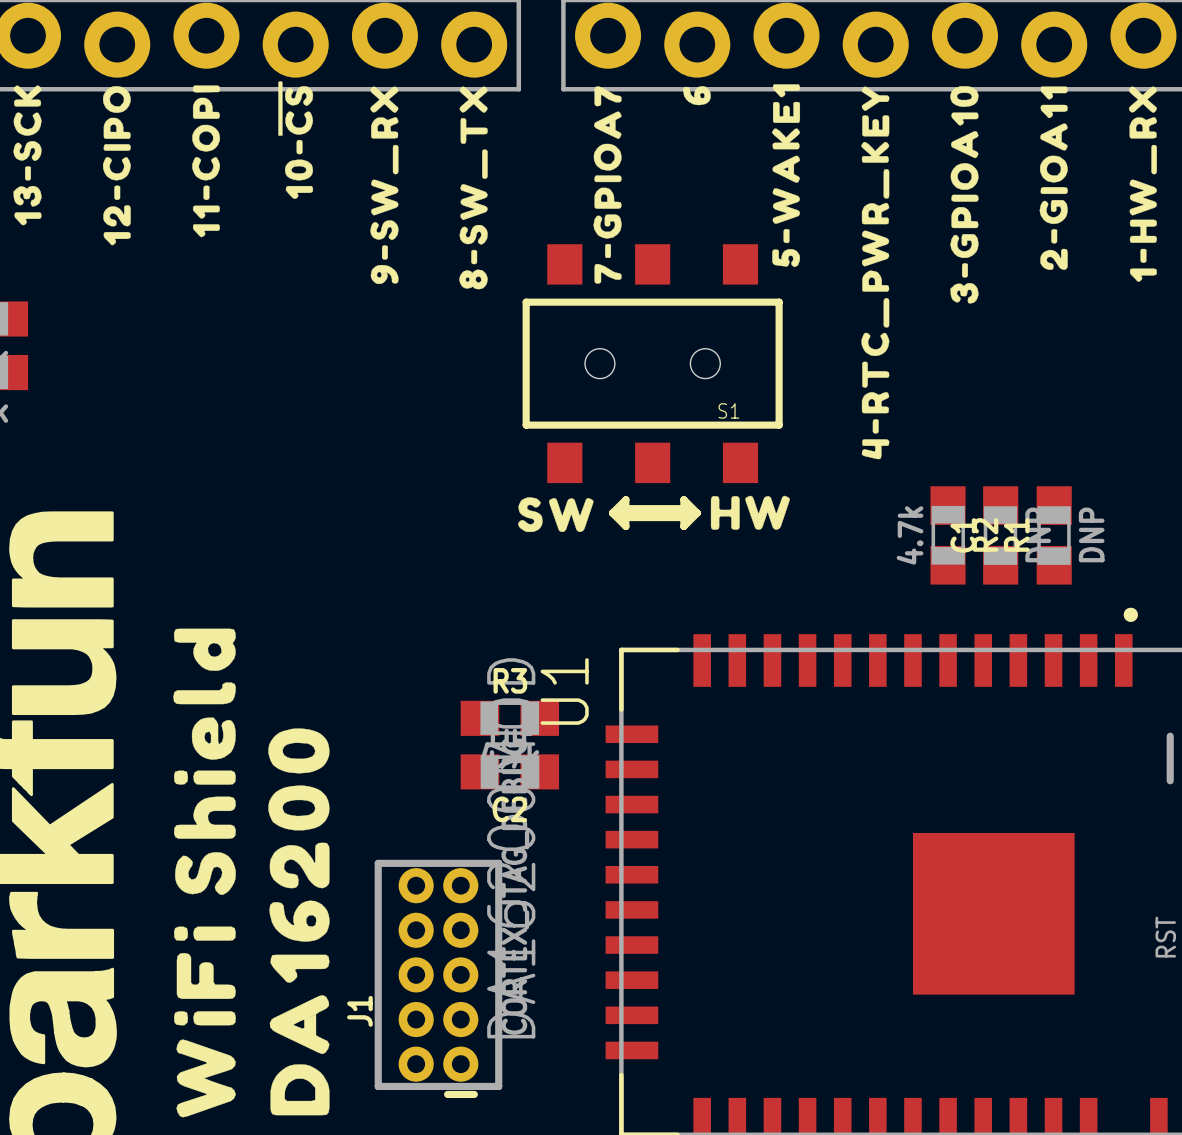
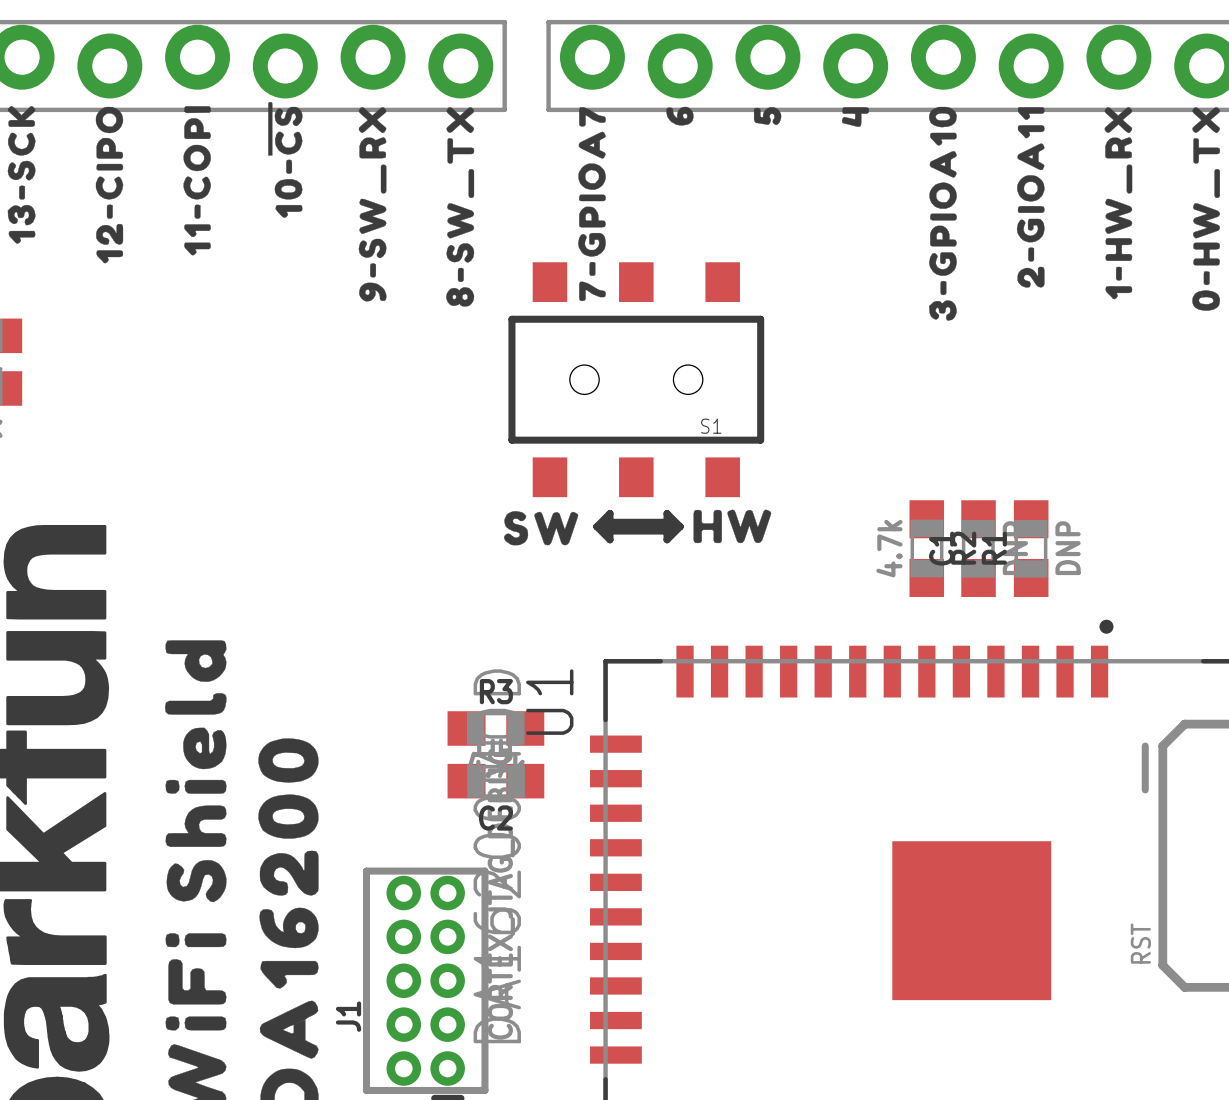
drawing: [771, 84, 801, 267] -> none
drawing: none -> [753, 107, 782, 126]
drawing: [861, 86, 890, 460] -> none
drawing: none -> [842, 107, 869, 127]

